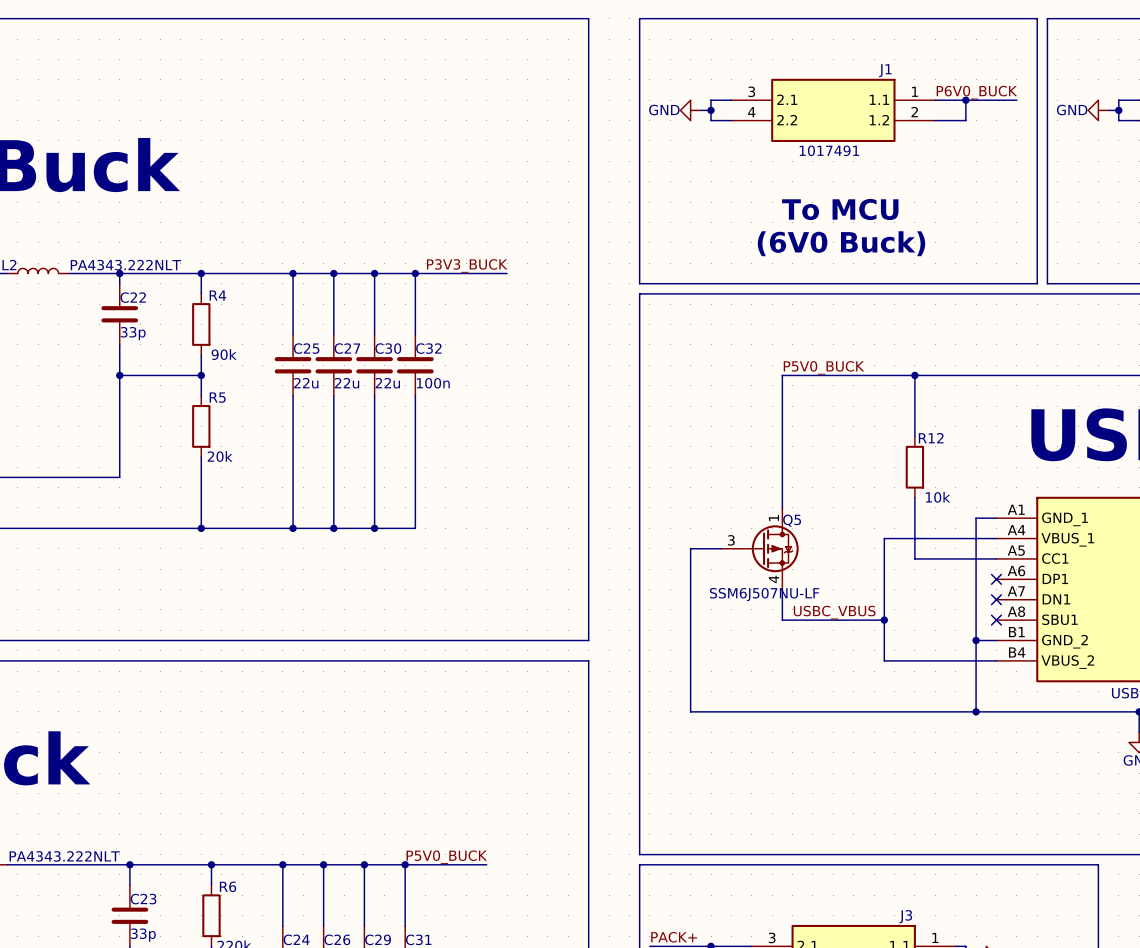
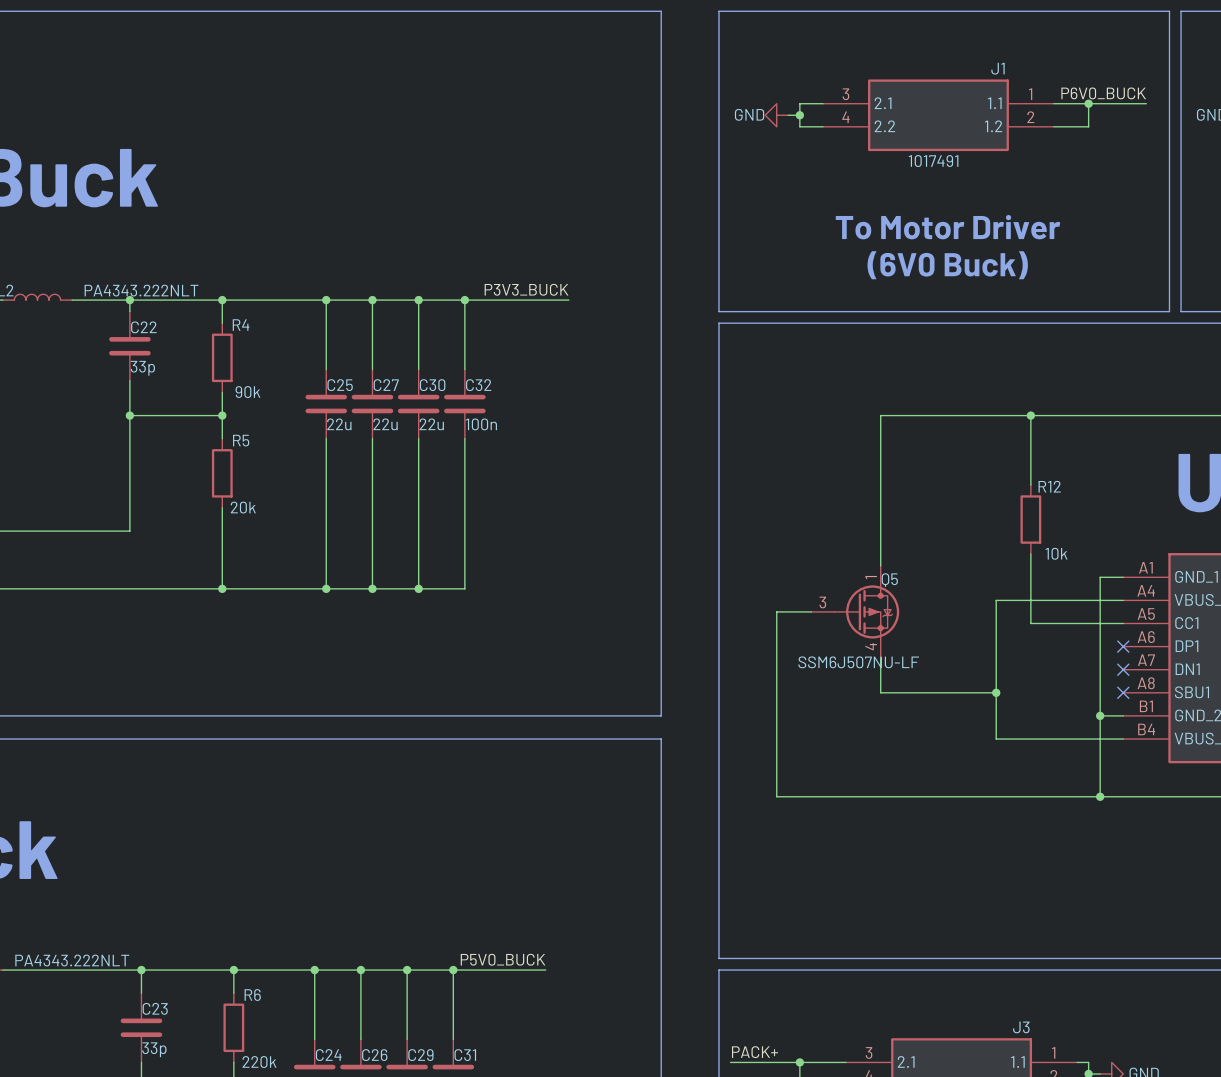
text: To MCU (840, 209) -> To Motor Driver (948, 227)
label: P5V0_BUCK (823, 367) -> none
label: USBC_VBUS (834, 612) -> none

